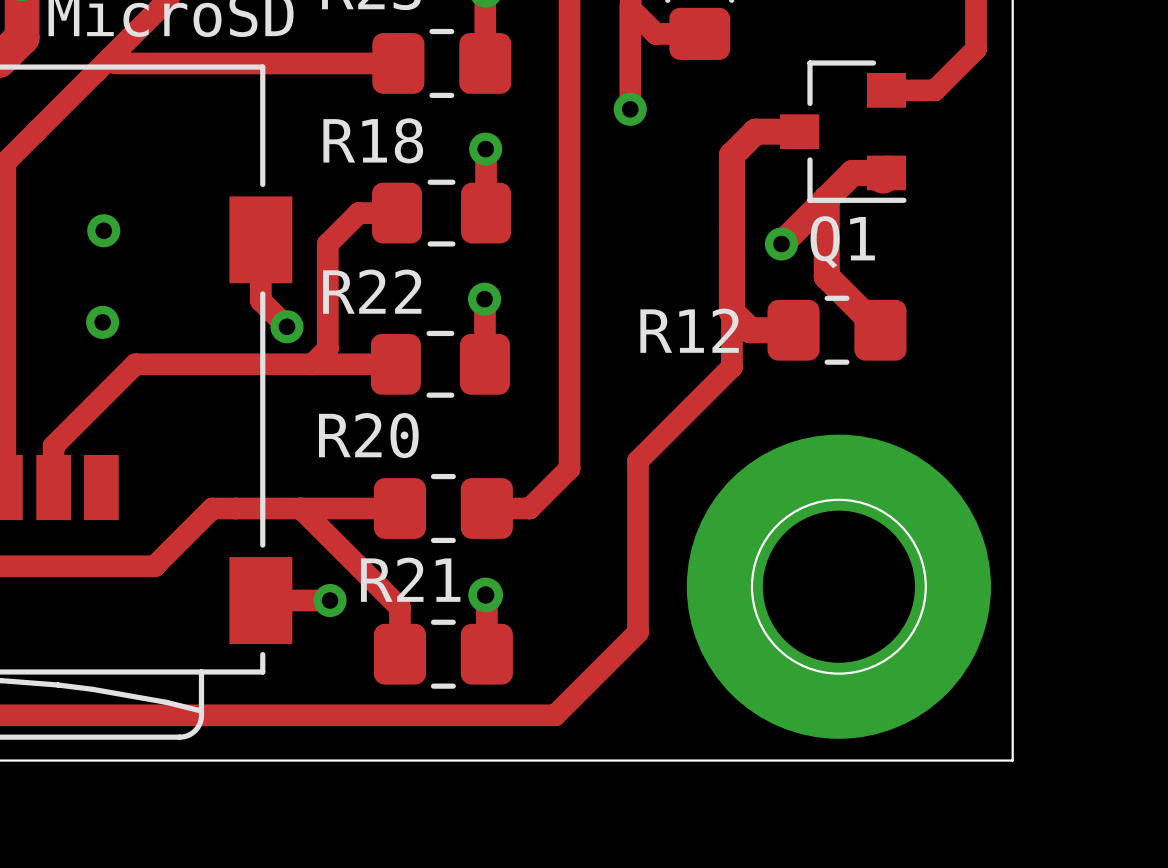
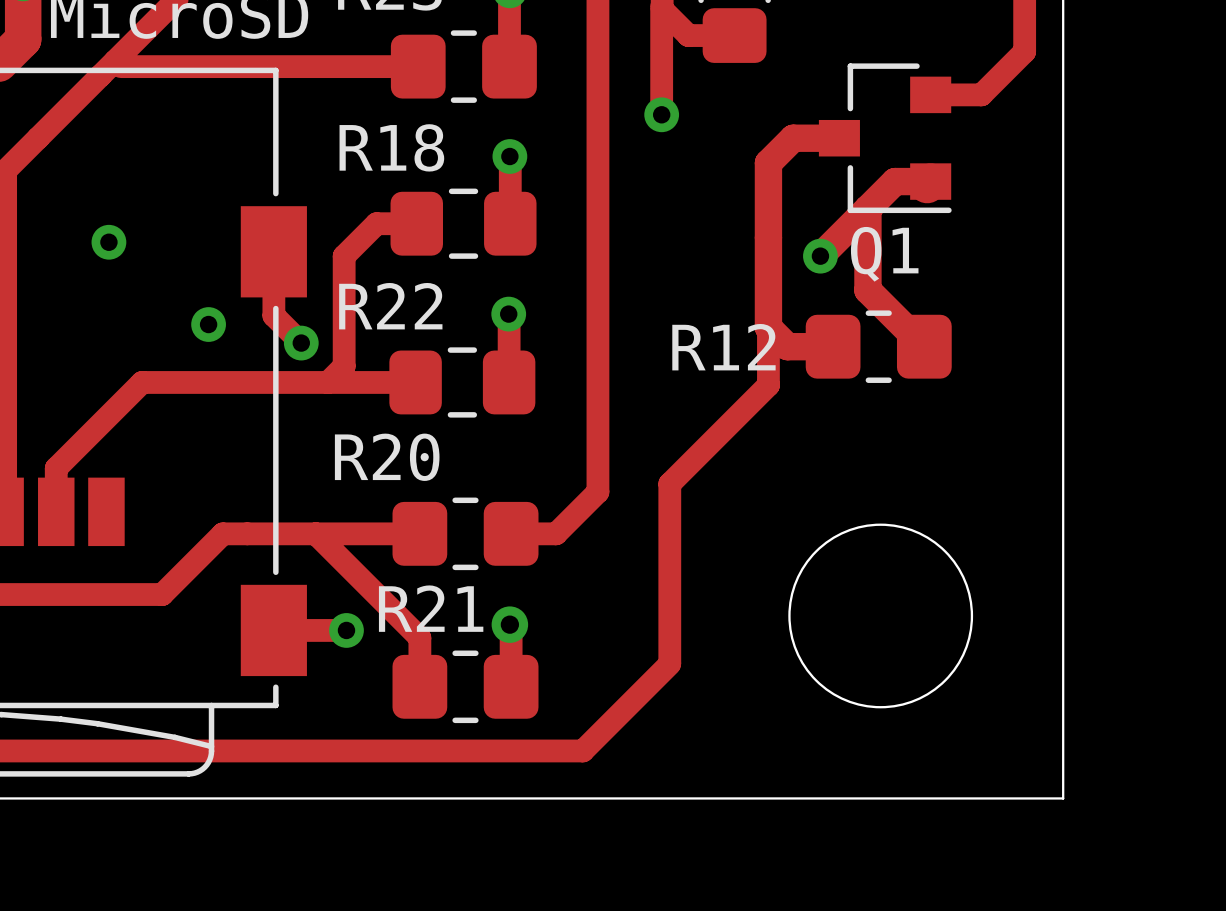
via position: (102, 322) -> (208, 324)
part: (838, 586) -> none

